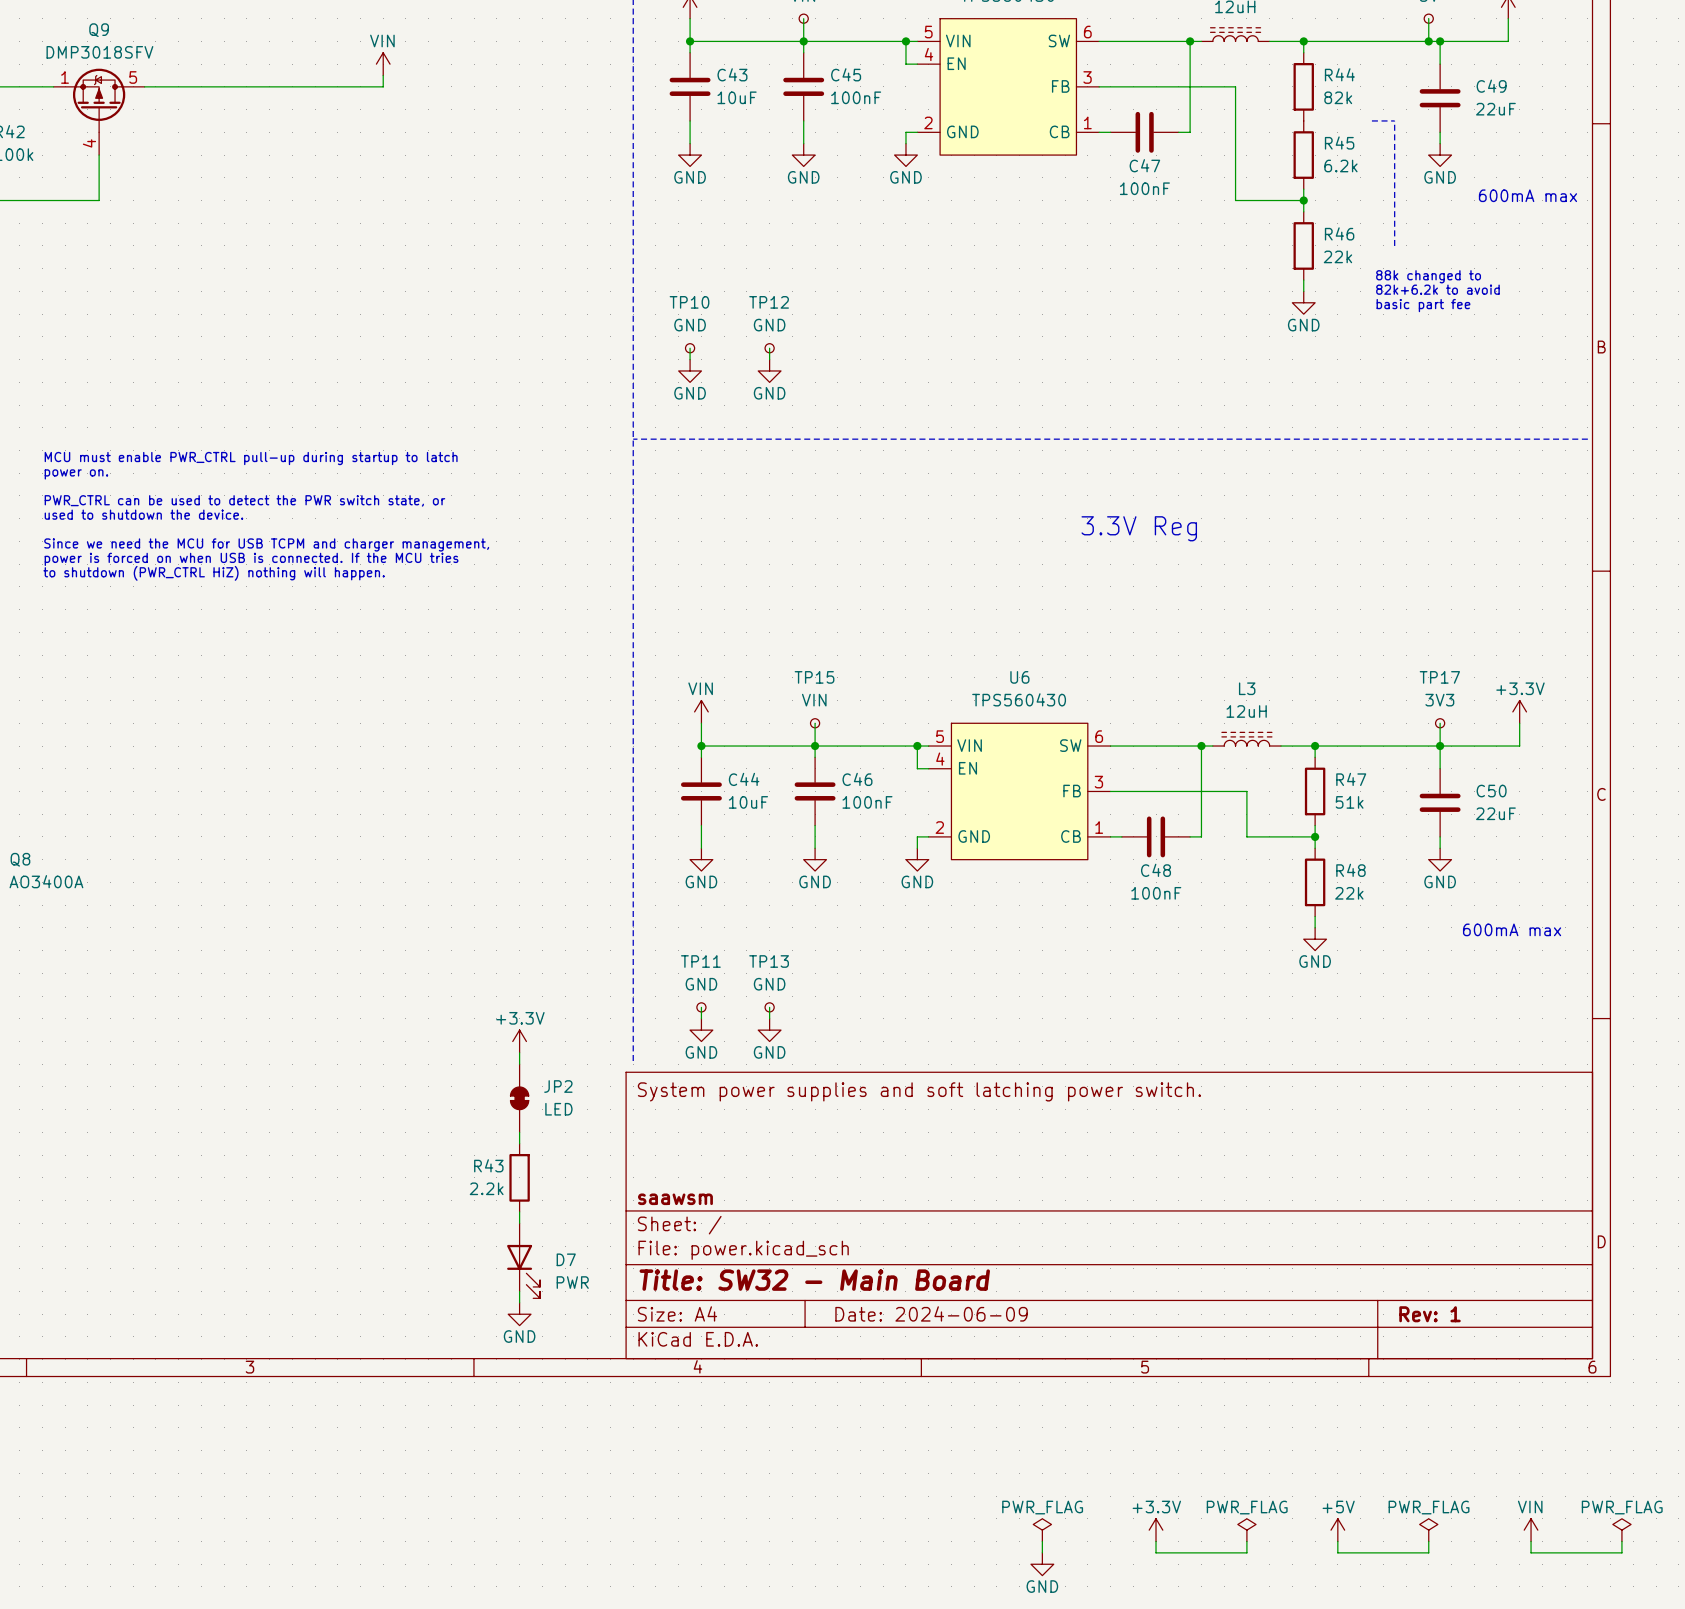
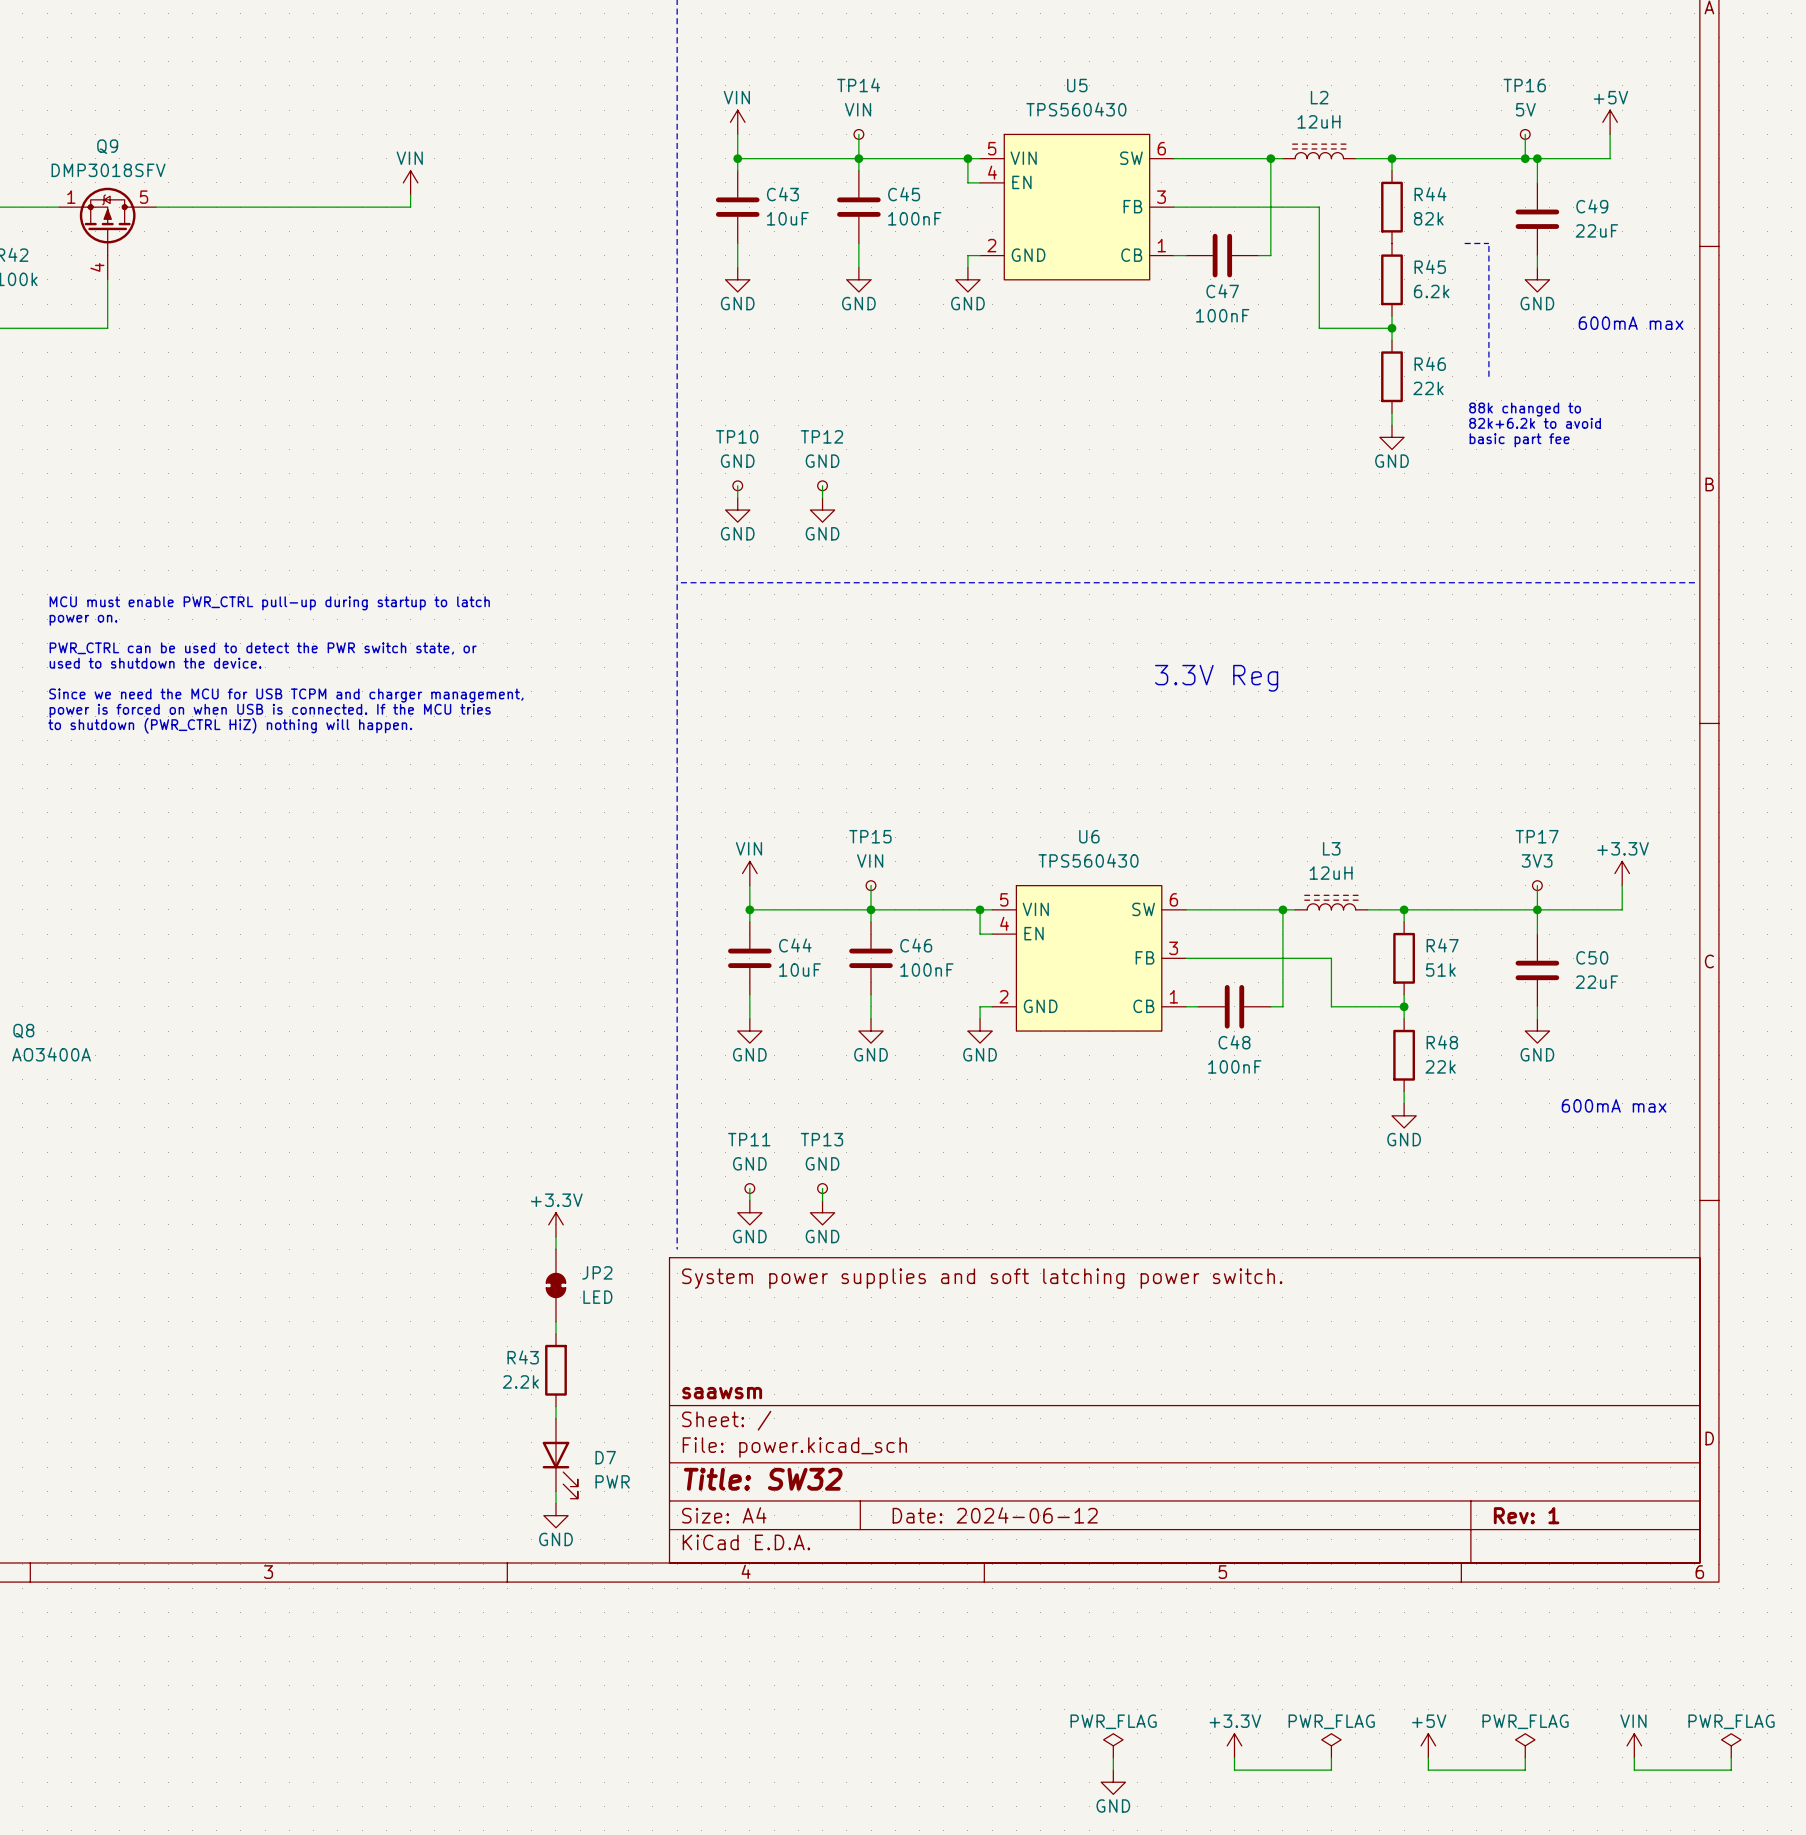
title block: Title: SW32 - Main Board (814, 1280) -> Title: SW32 (763, 1479)
title block: Date: 2024-06-09 (931, 1313) -> Date: 2024-06-12 (995, 1515)

